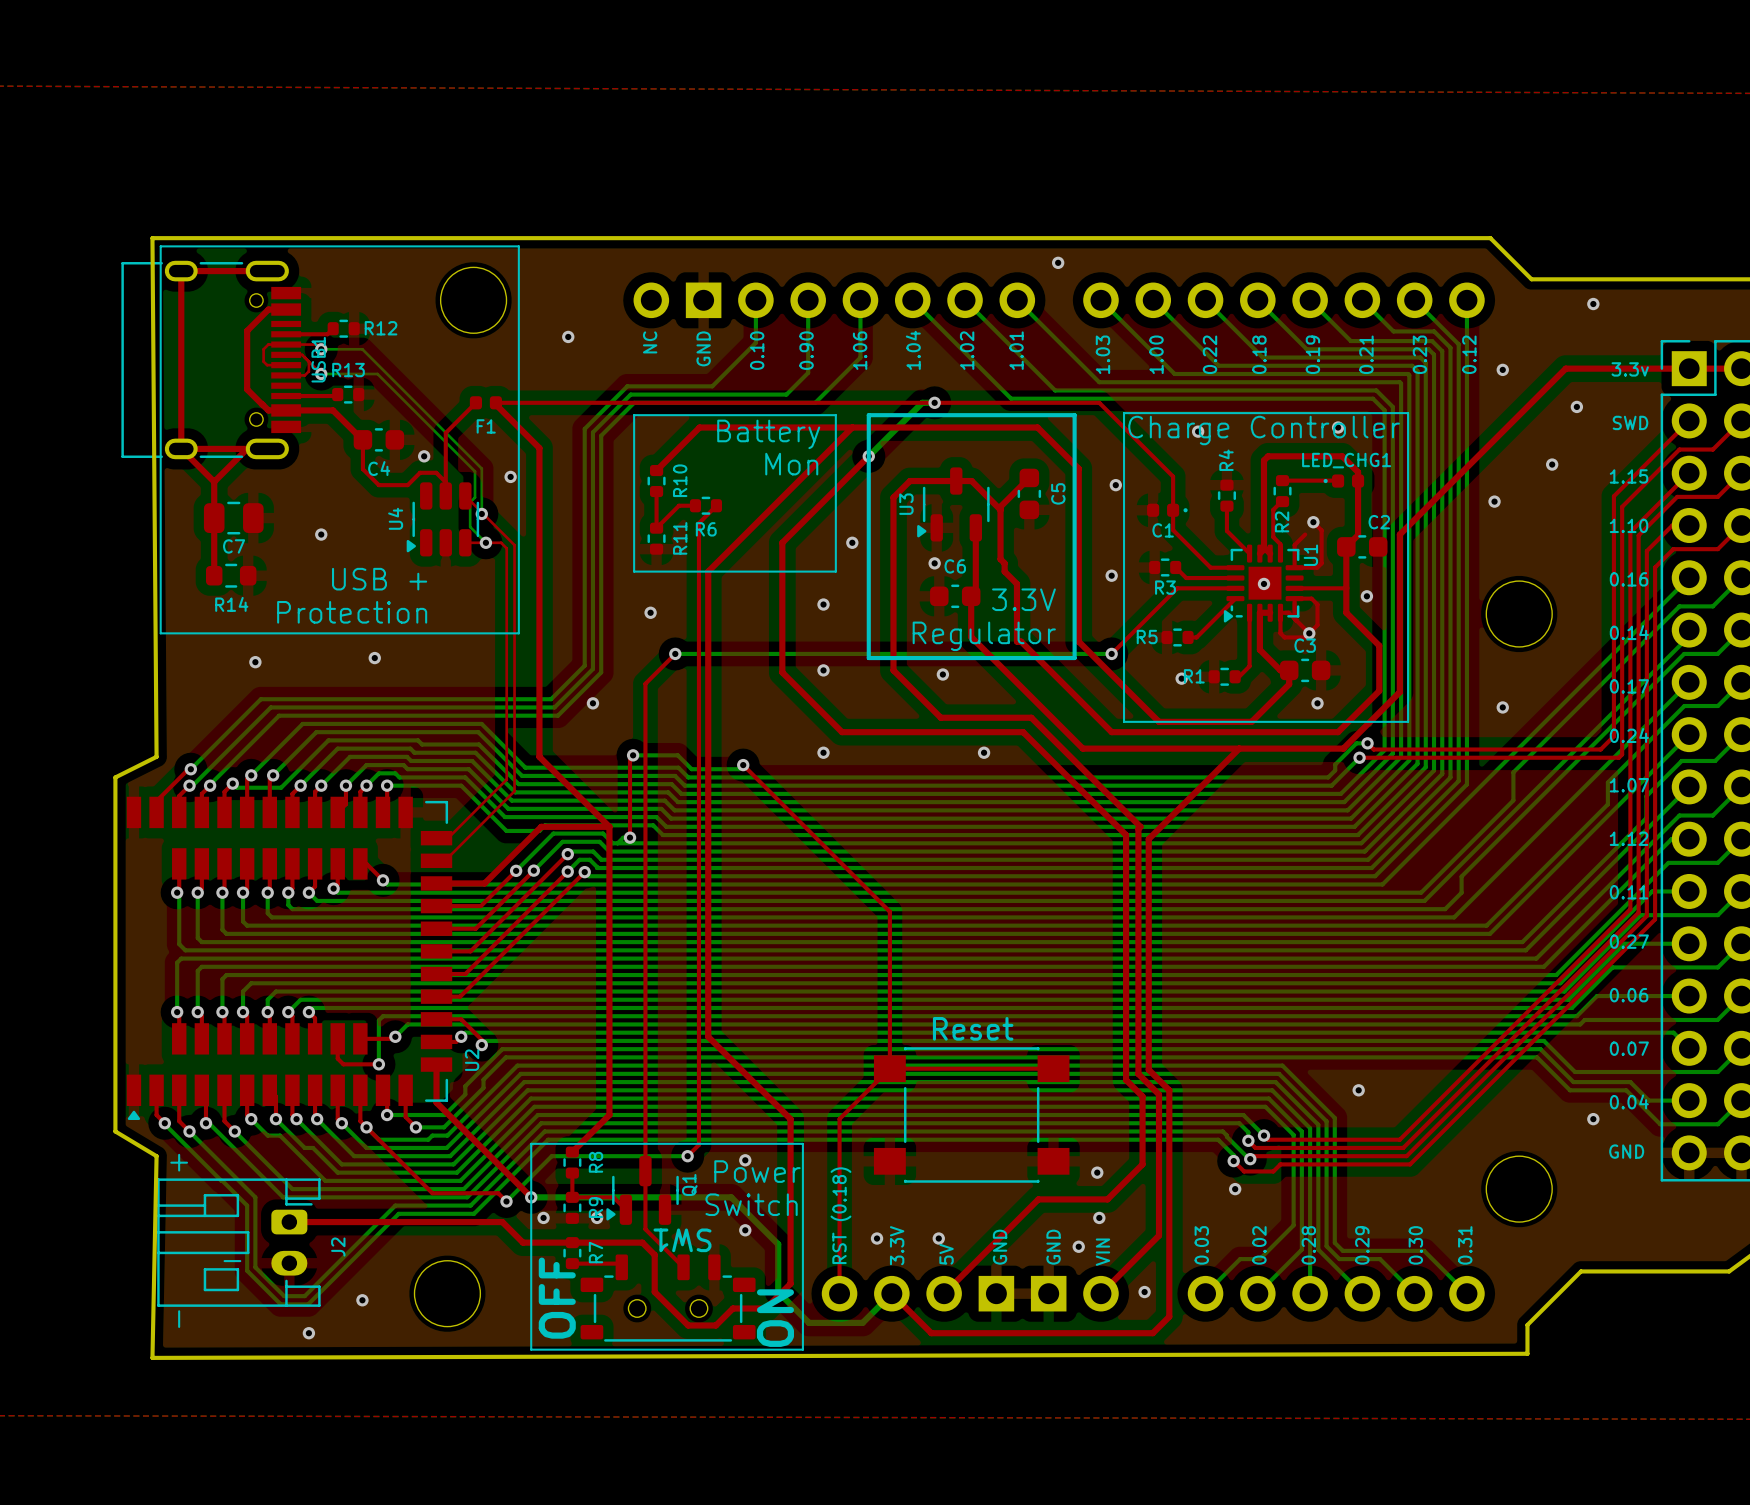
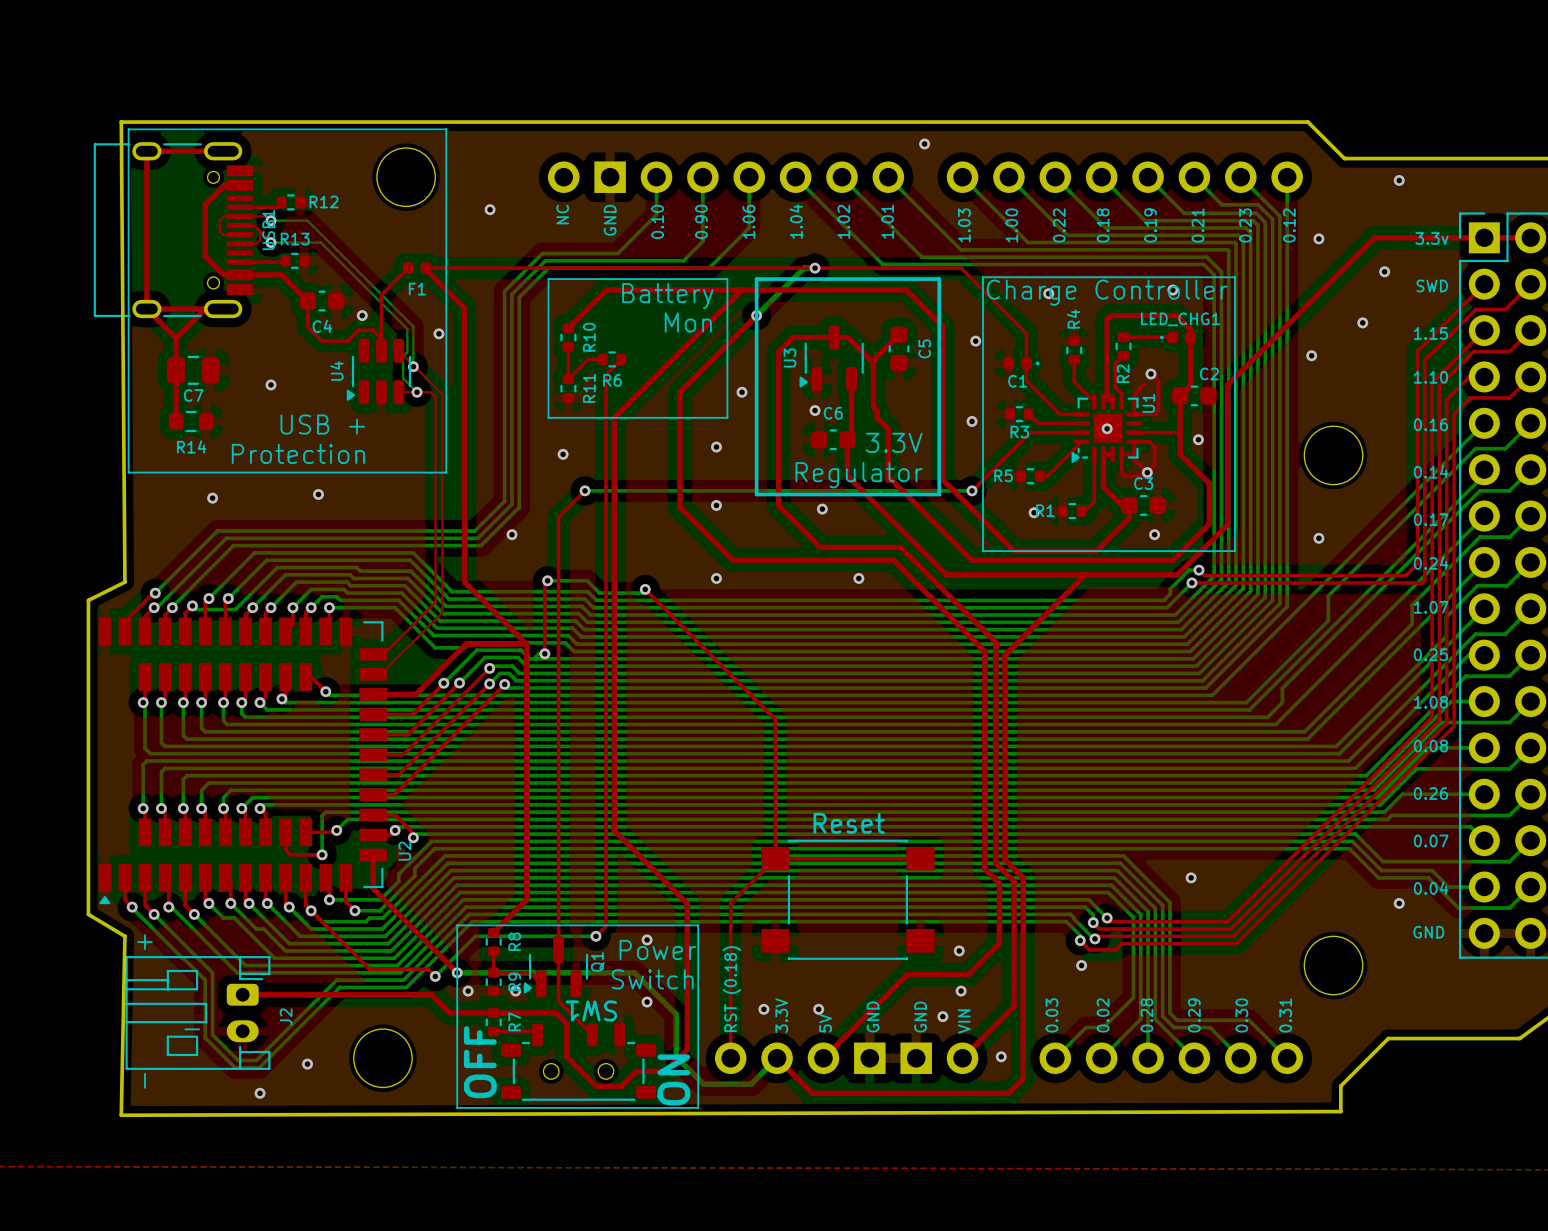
text: 1.12 (1629, 838) -> 0.25 (1430, 654)
text: 0.11 (1629, 892) -> 1.08 (1430, 702)
text: 0.27 (1629, 941) -> 0.08 (1430, 746)
text: 0.06 (1629, 995) -> 0.26 (1430, 793)

